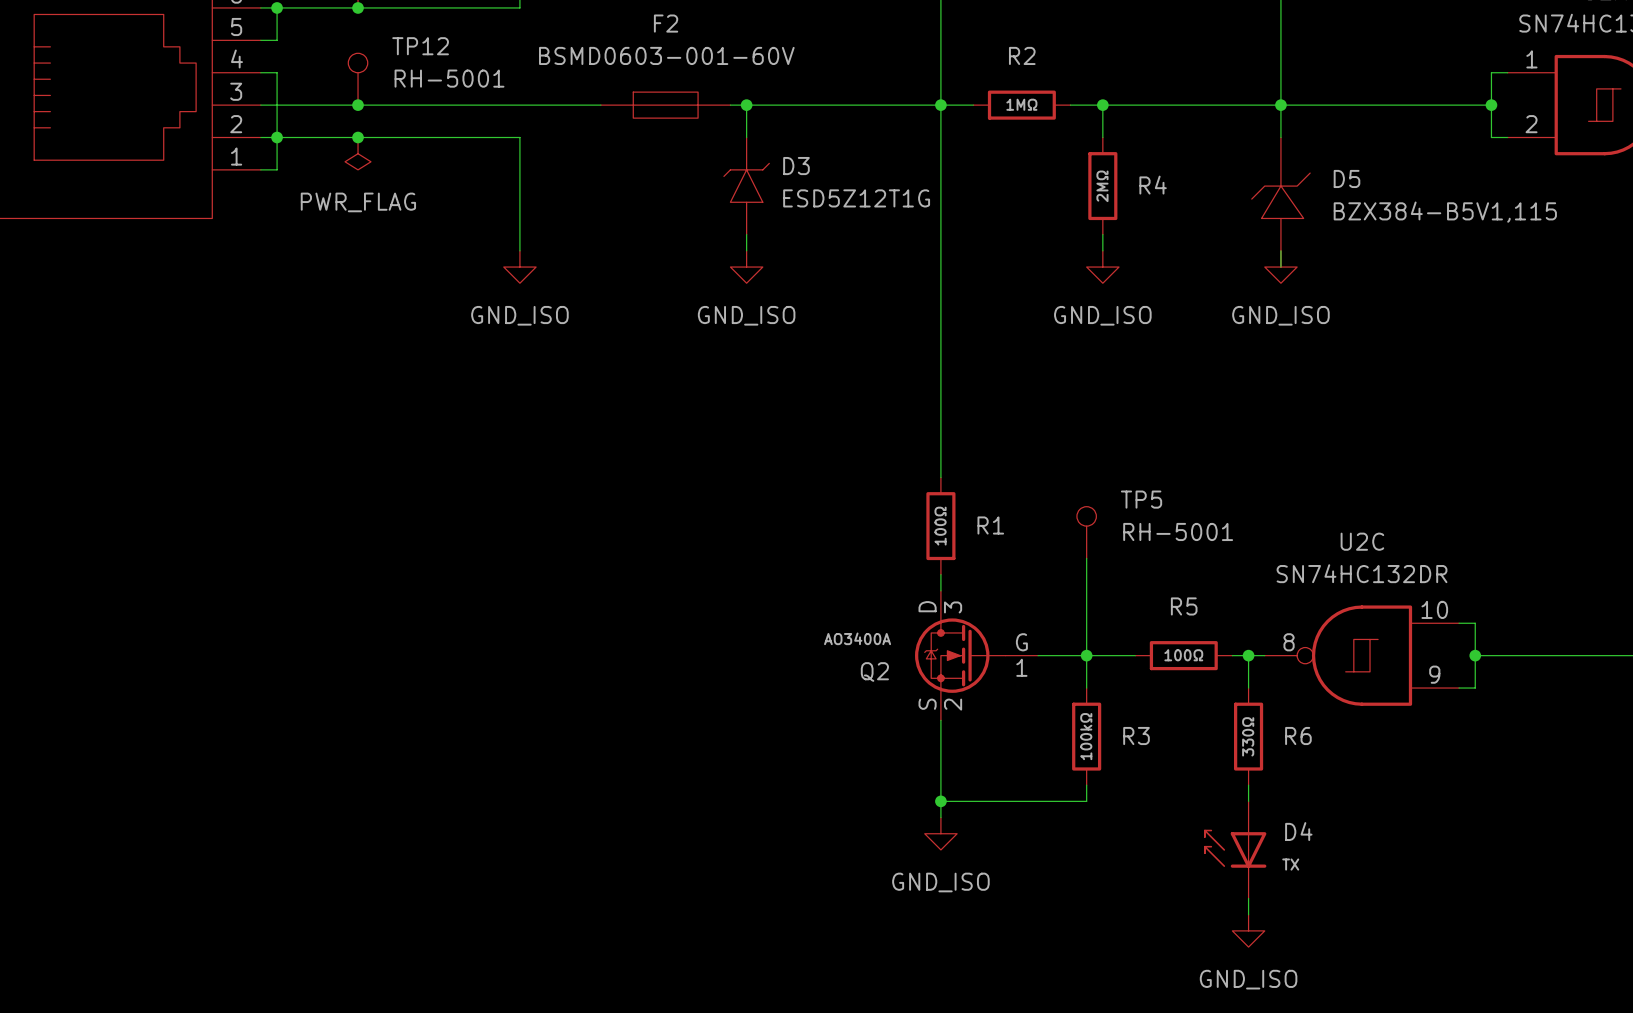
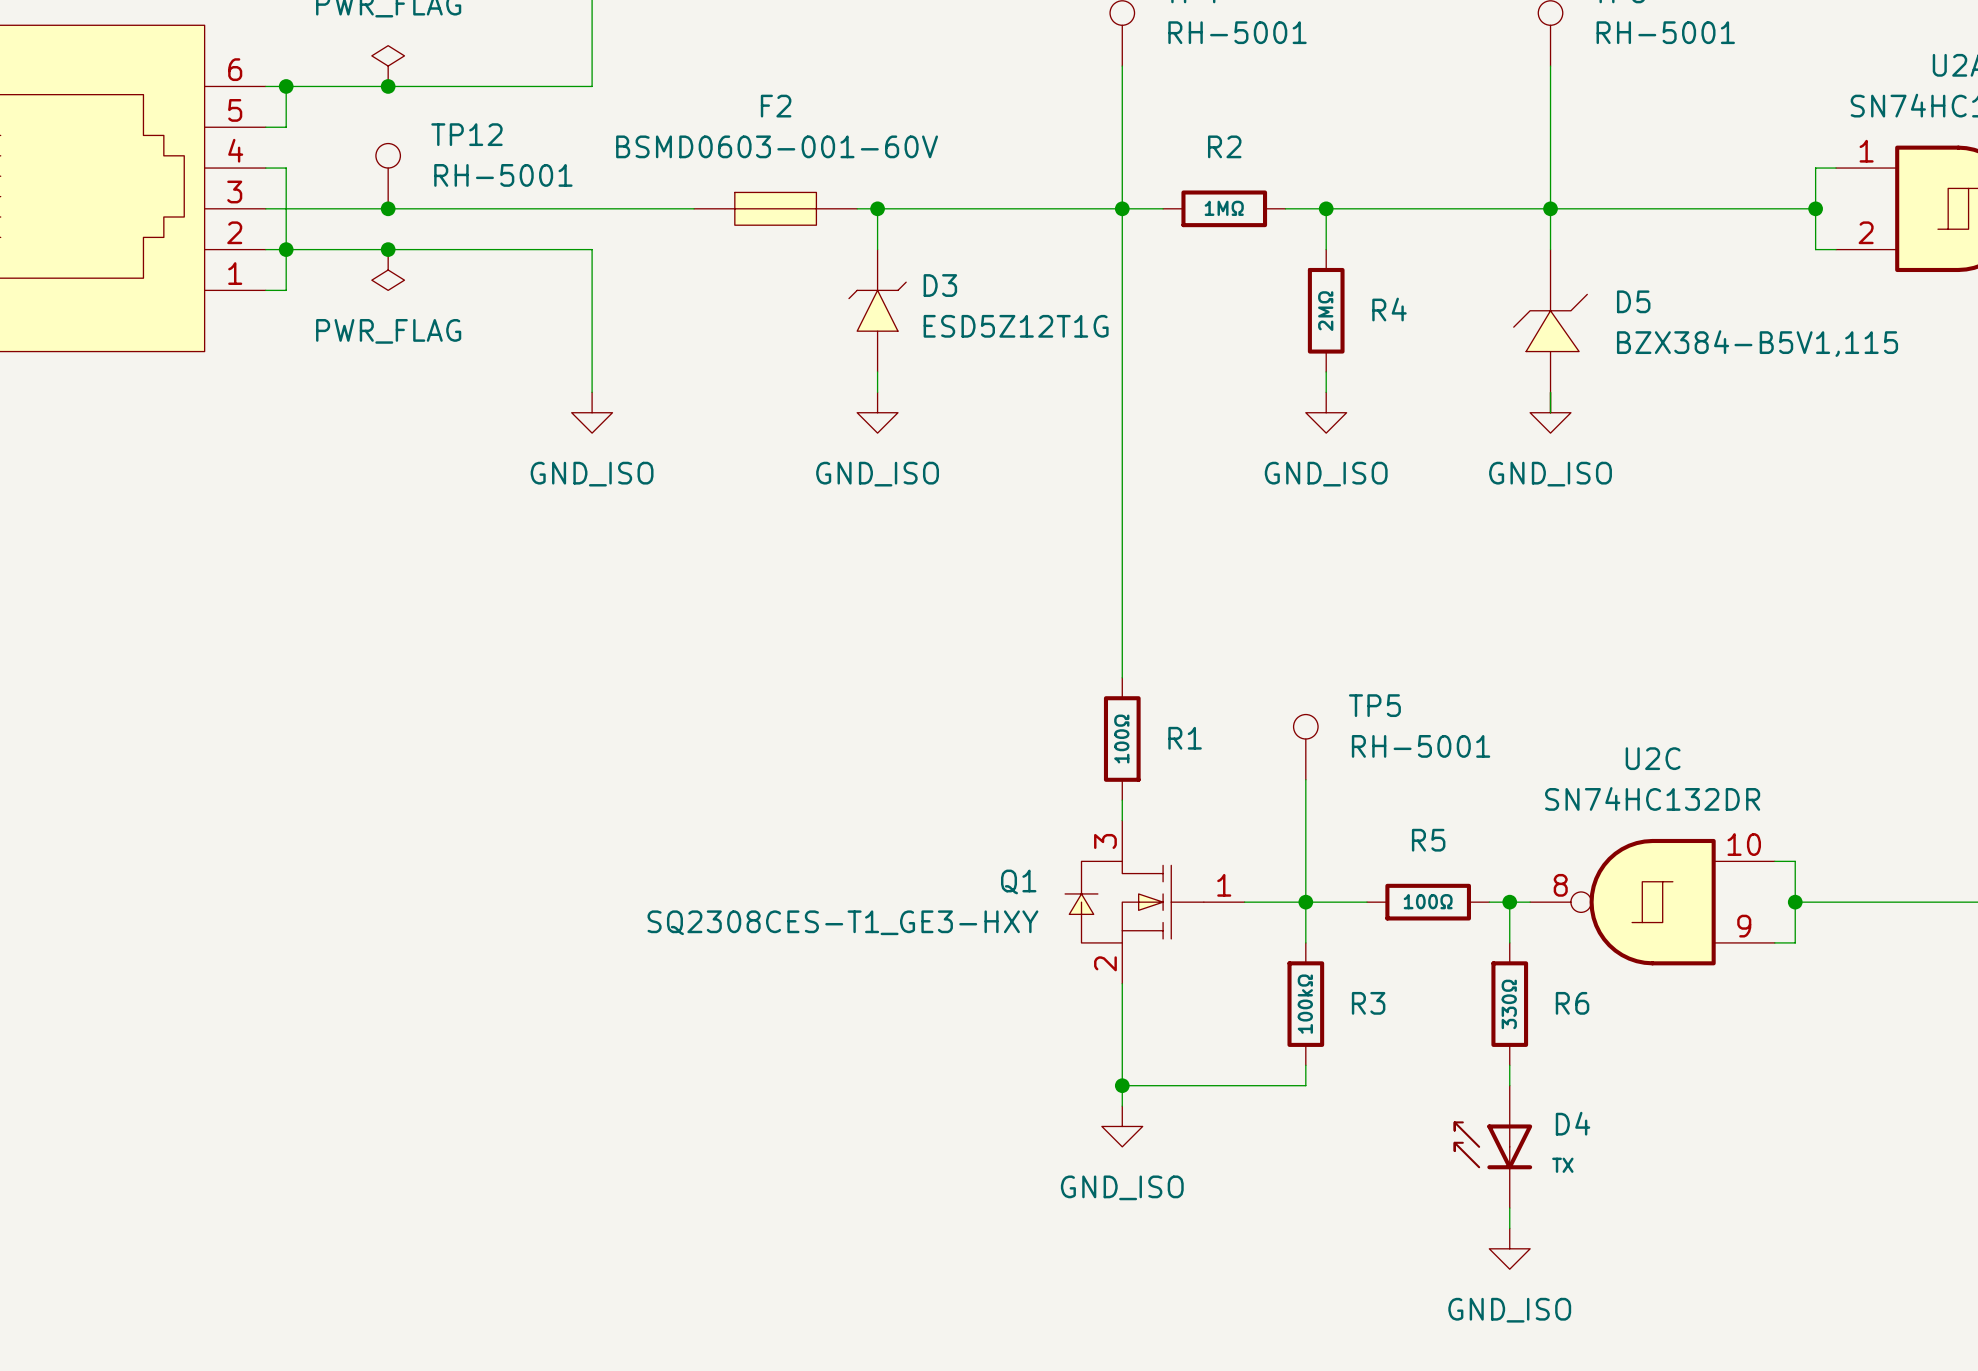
Q1: none -> SQ2308CES-T1_GE3-HXY (1154, 902)
Q2: AO3400A (976, 655) -> none

